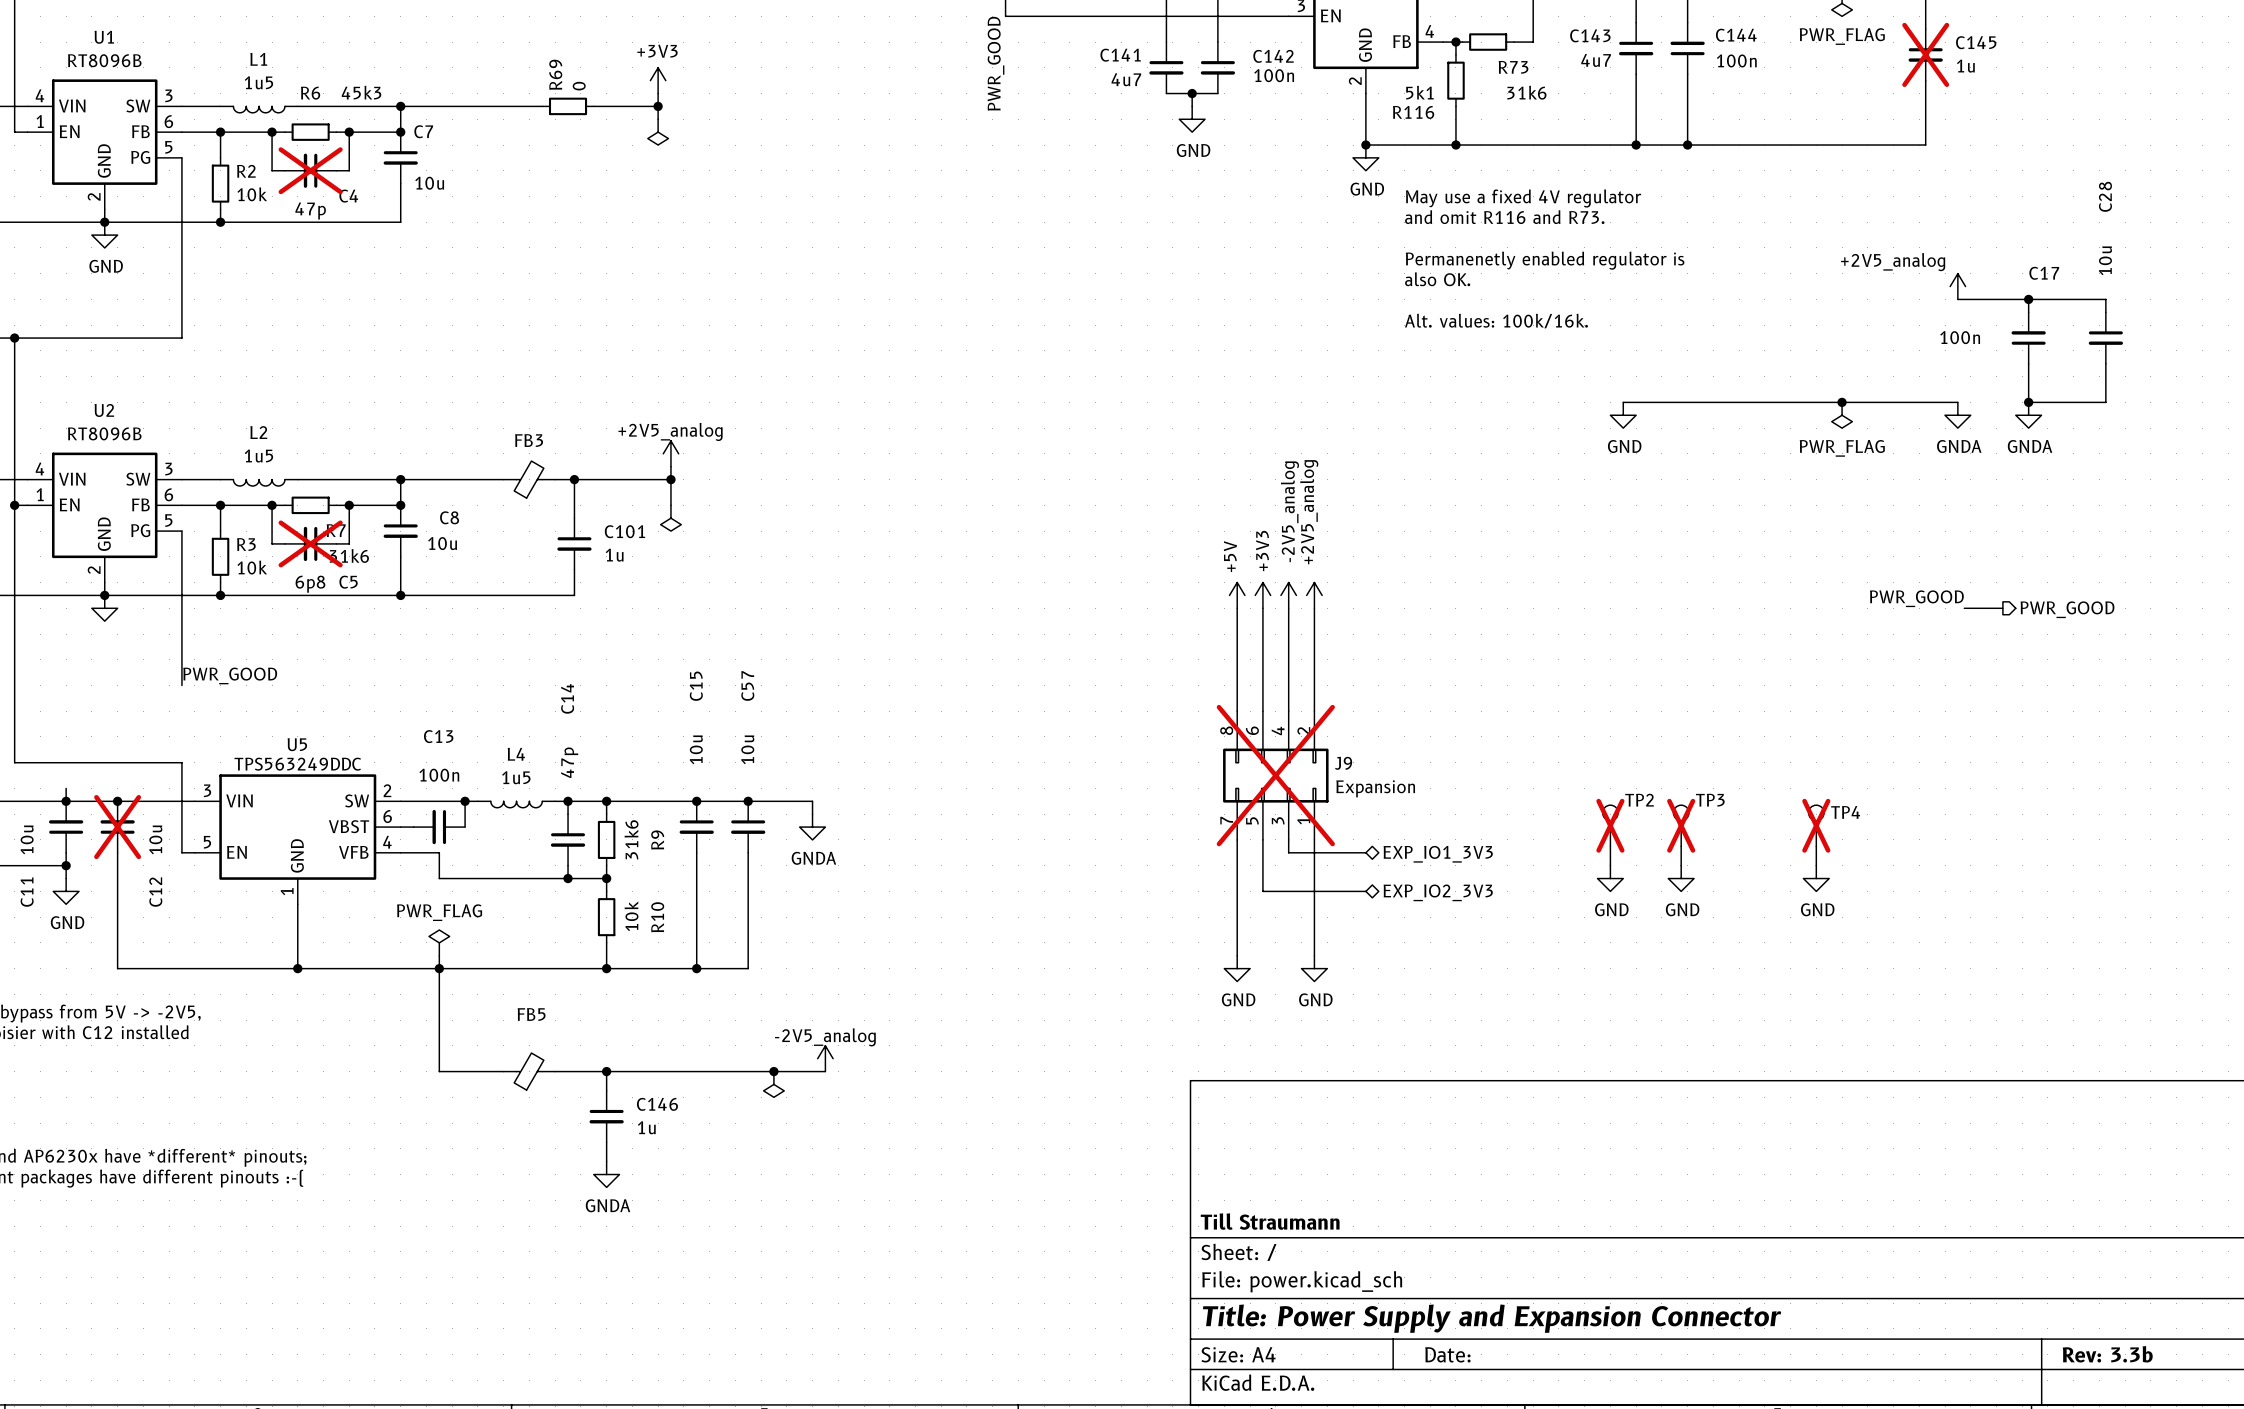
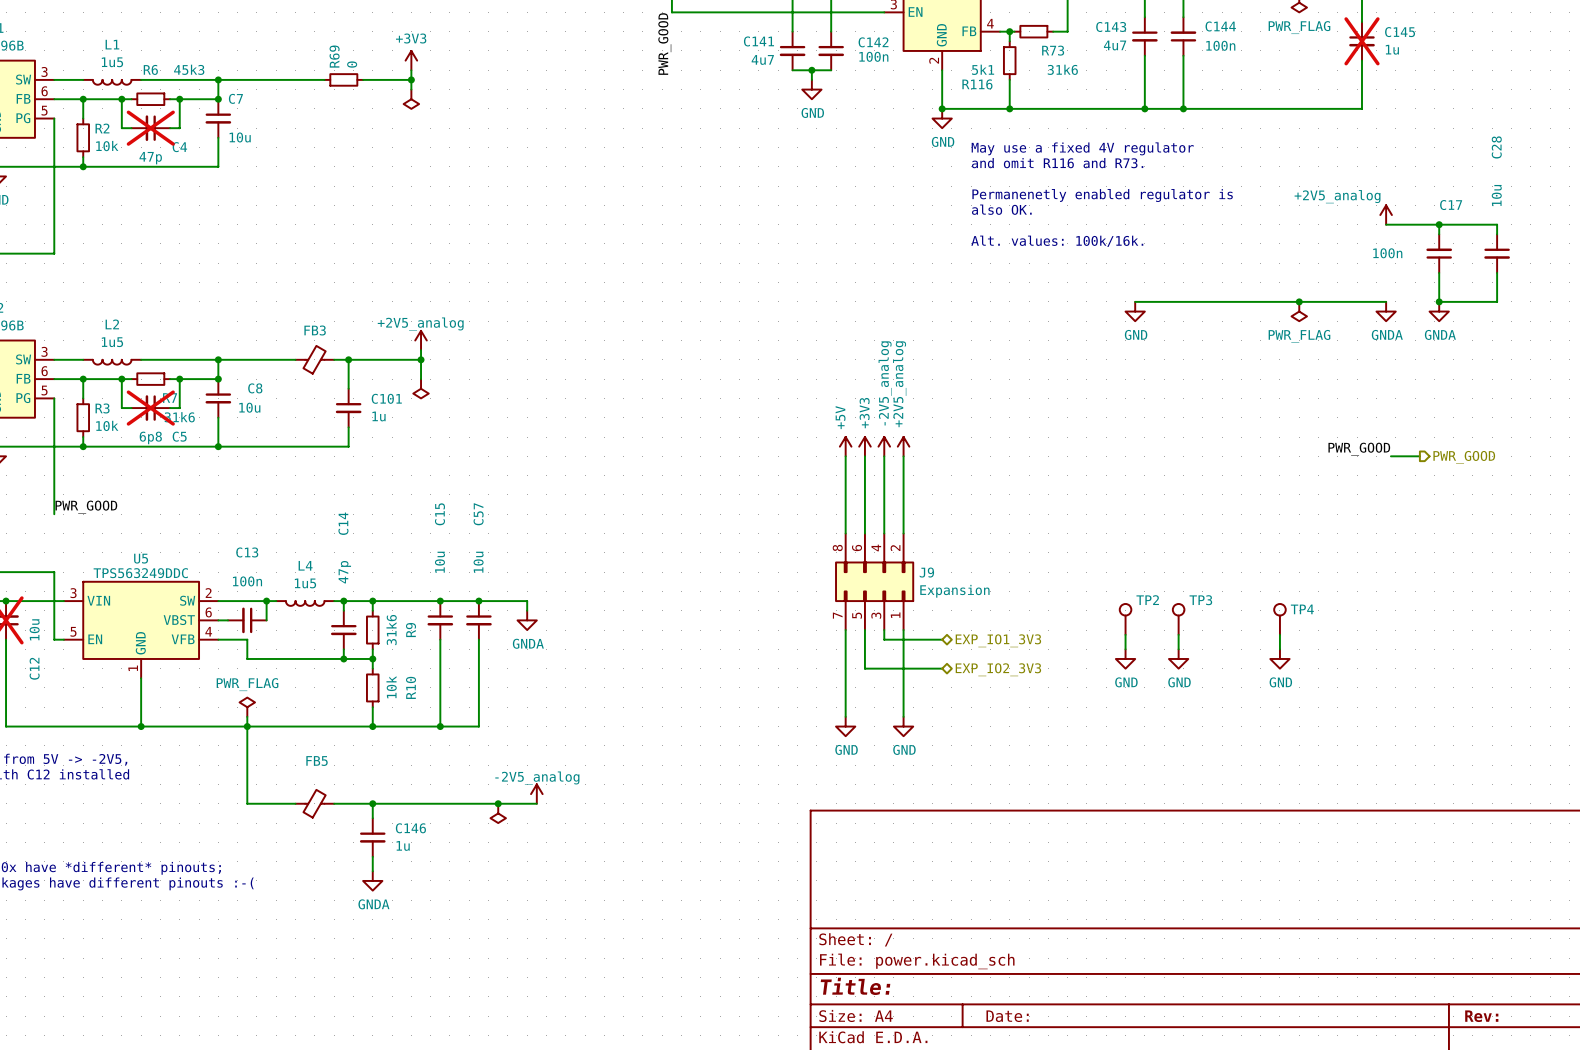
J9 do-not-place cross: (1275, 775) -> none
TP2 do-not-place cross: (1610, 825) -> none
TP3 do-not-place cross: (1681, 825) -> none
TP4 do-not-place cross: (1816, 825) -> none
title block: Till Straumann (1270, 1221) -> none
title block: Title: Power Supply and Expansion Connector (1492, 1318) -> Title: (855, 986)
title block: Rev: 3.3b (2107, 1354) -> Rev: (1481, 1016)

